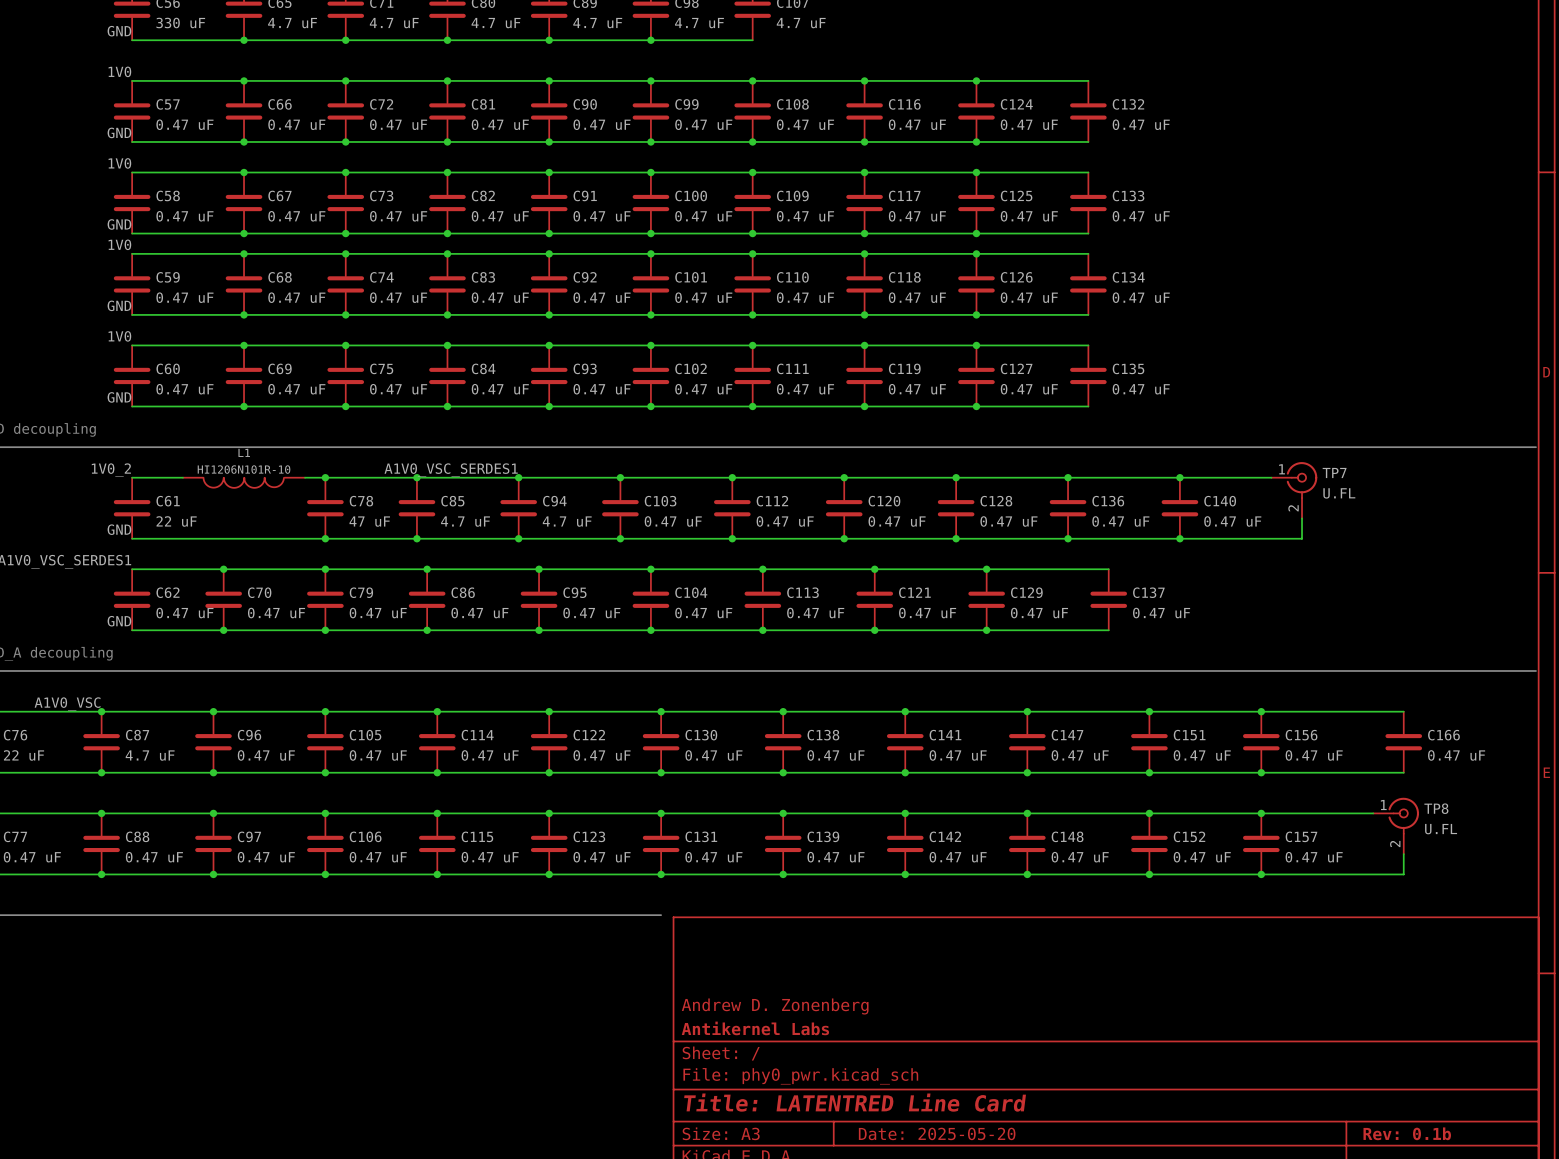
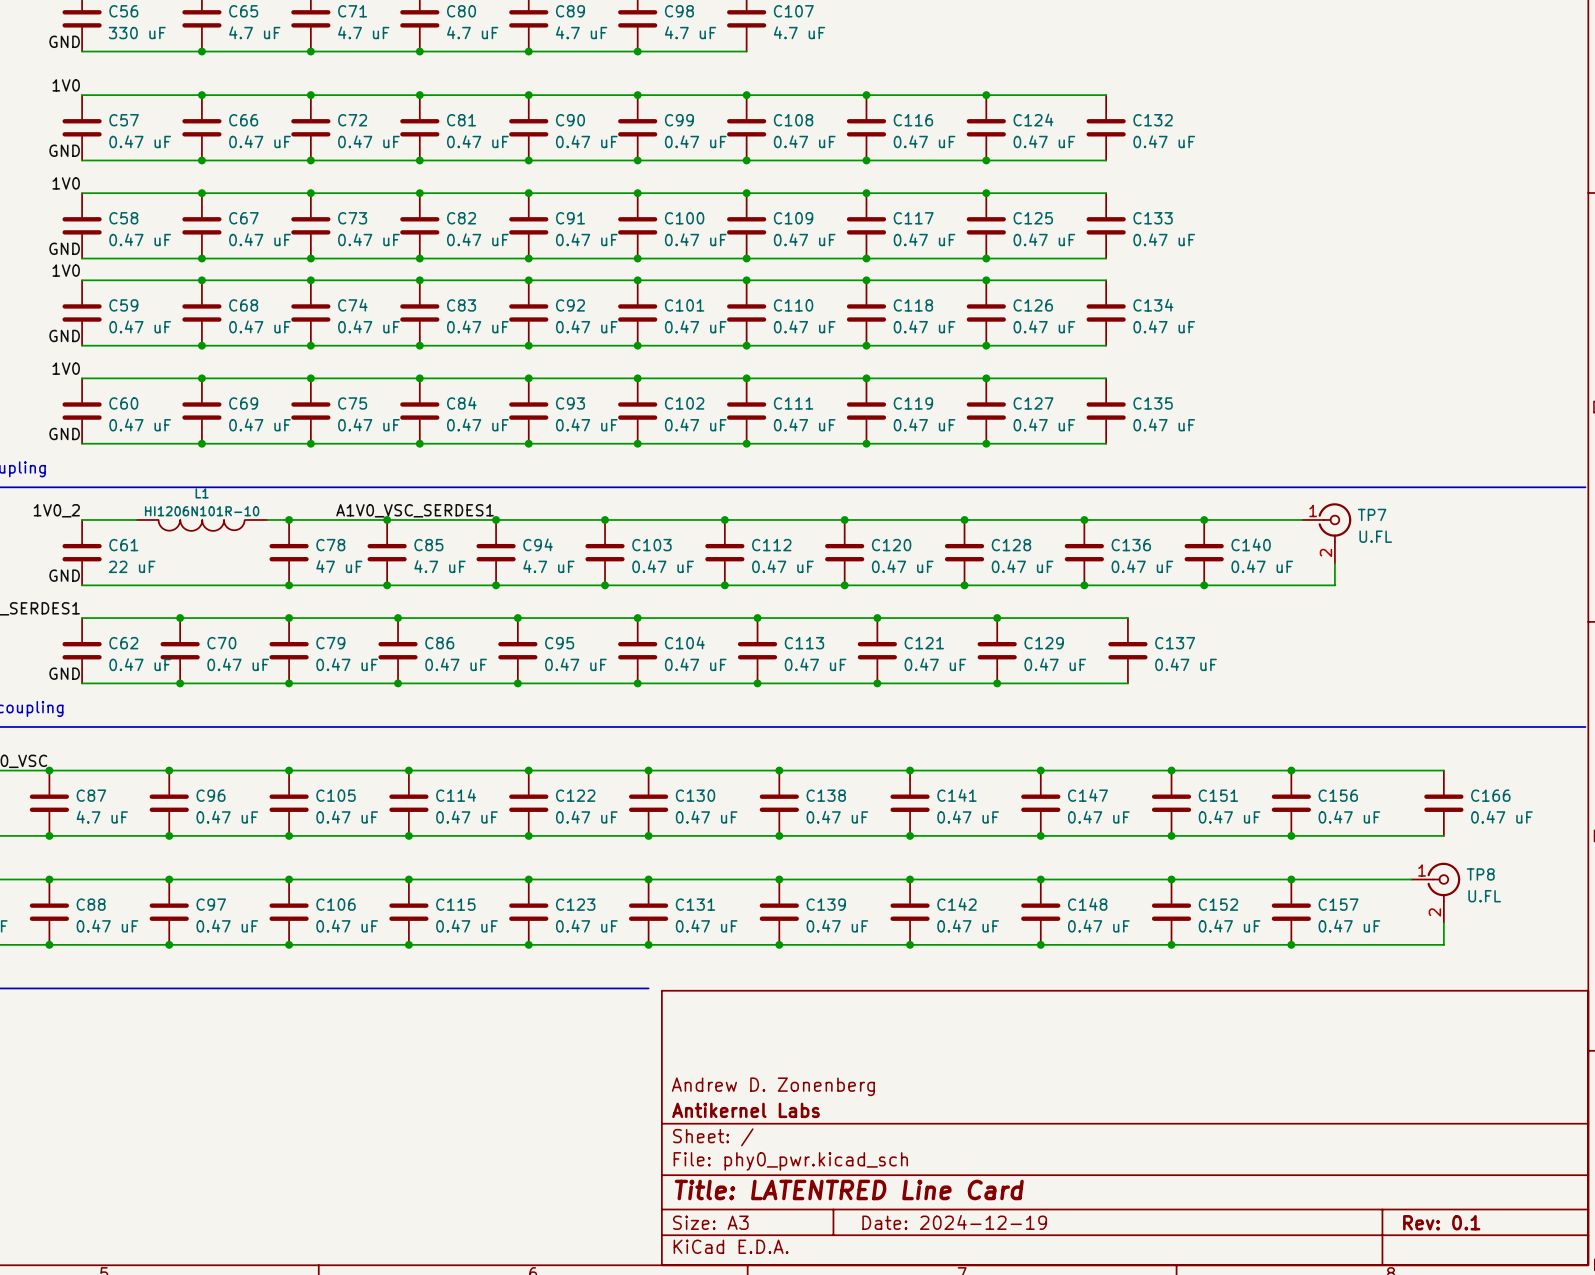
title block: Date: 2025-05-20 (937, 1133) -> Date: 2024-12-19 (954, 1222)
title block: Rev: 0.1b (1407, 1133) -> Rev: 0.1 (1441, 1222)

